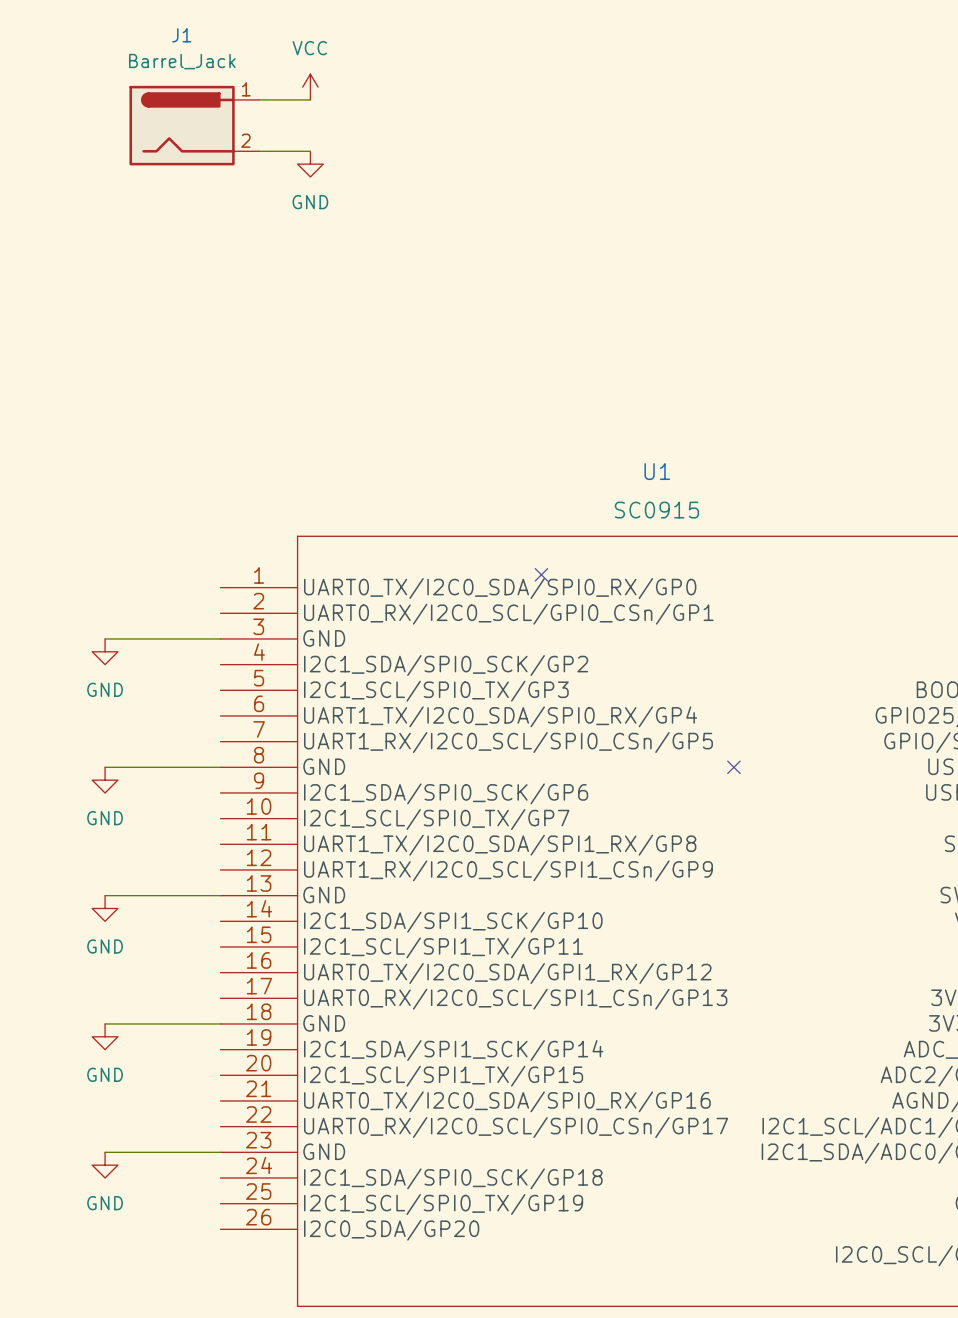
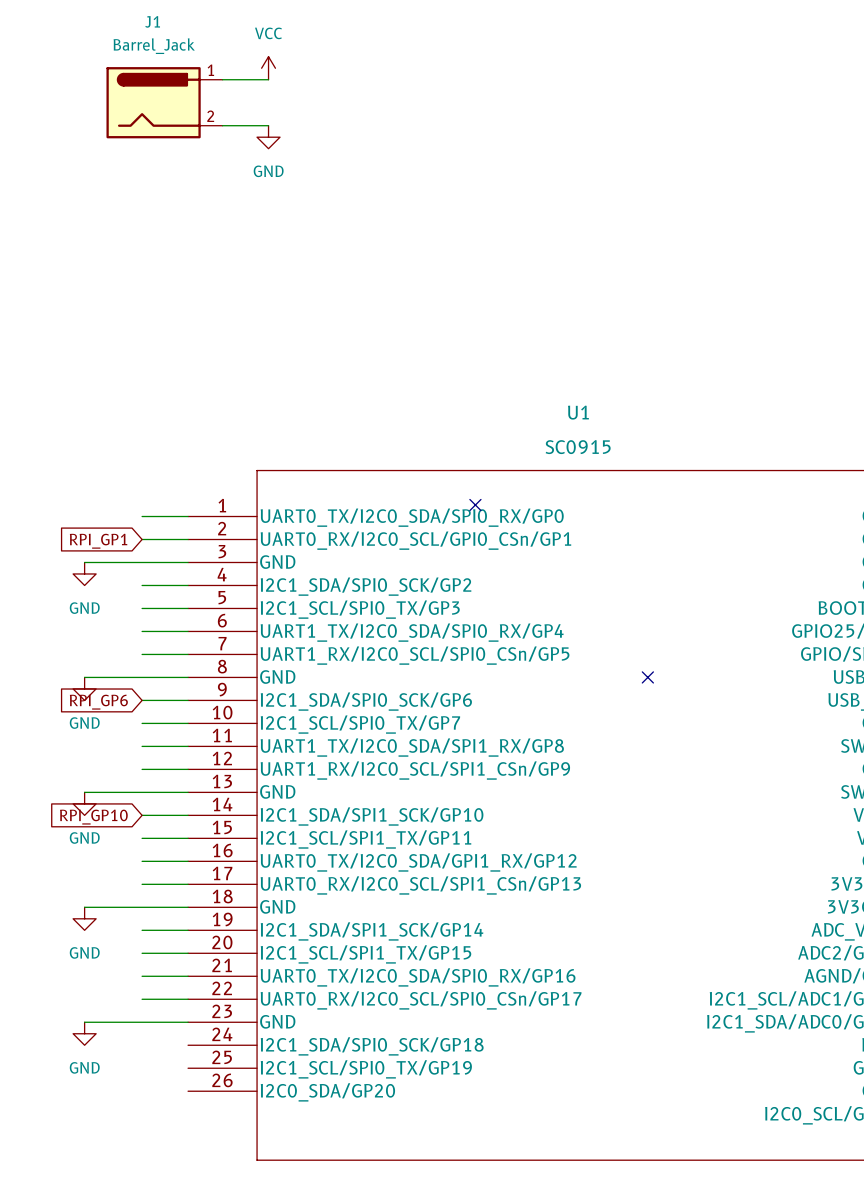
wire: none -> (142, 516) (188, 516)
global label: none -> RPI_GP1 (98, 541)
wire: none -> (142, 539) (188, 539)
wire: none -> (142, 585) (188, 585)
wire: none -> (142, 608) (188, 608)
wire: none -> (142, 631) (188, 631)
wire: none -> (142, 654) (188, 654)
wire: none -> (142, 700) (188, 700)
global label: none -> RPI_GP6 (98, 702)
wire: none -> (142, 723) (188, 723)
wire: none -> (142, 746) (188, 746)
wire: none -> (142, 769) (188, 769)
global label: none -> RPI_GP10 (93, 817)
wire: none -> (142, 815) (188, 815)
wire: none -> (142, 838) (188, 838)
wire: none -> (142, 861) (188, 861)
wire: none -> (142, 884) (188, 884)
wire: none -> (142, 930) (188, 930)
wire: none -> (142, 953) (188, 953)
wire: none -> (142, 976) (188, 976)
wire: none -> (142, 999) (188, 999)

